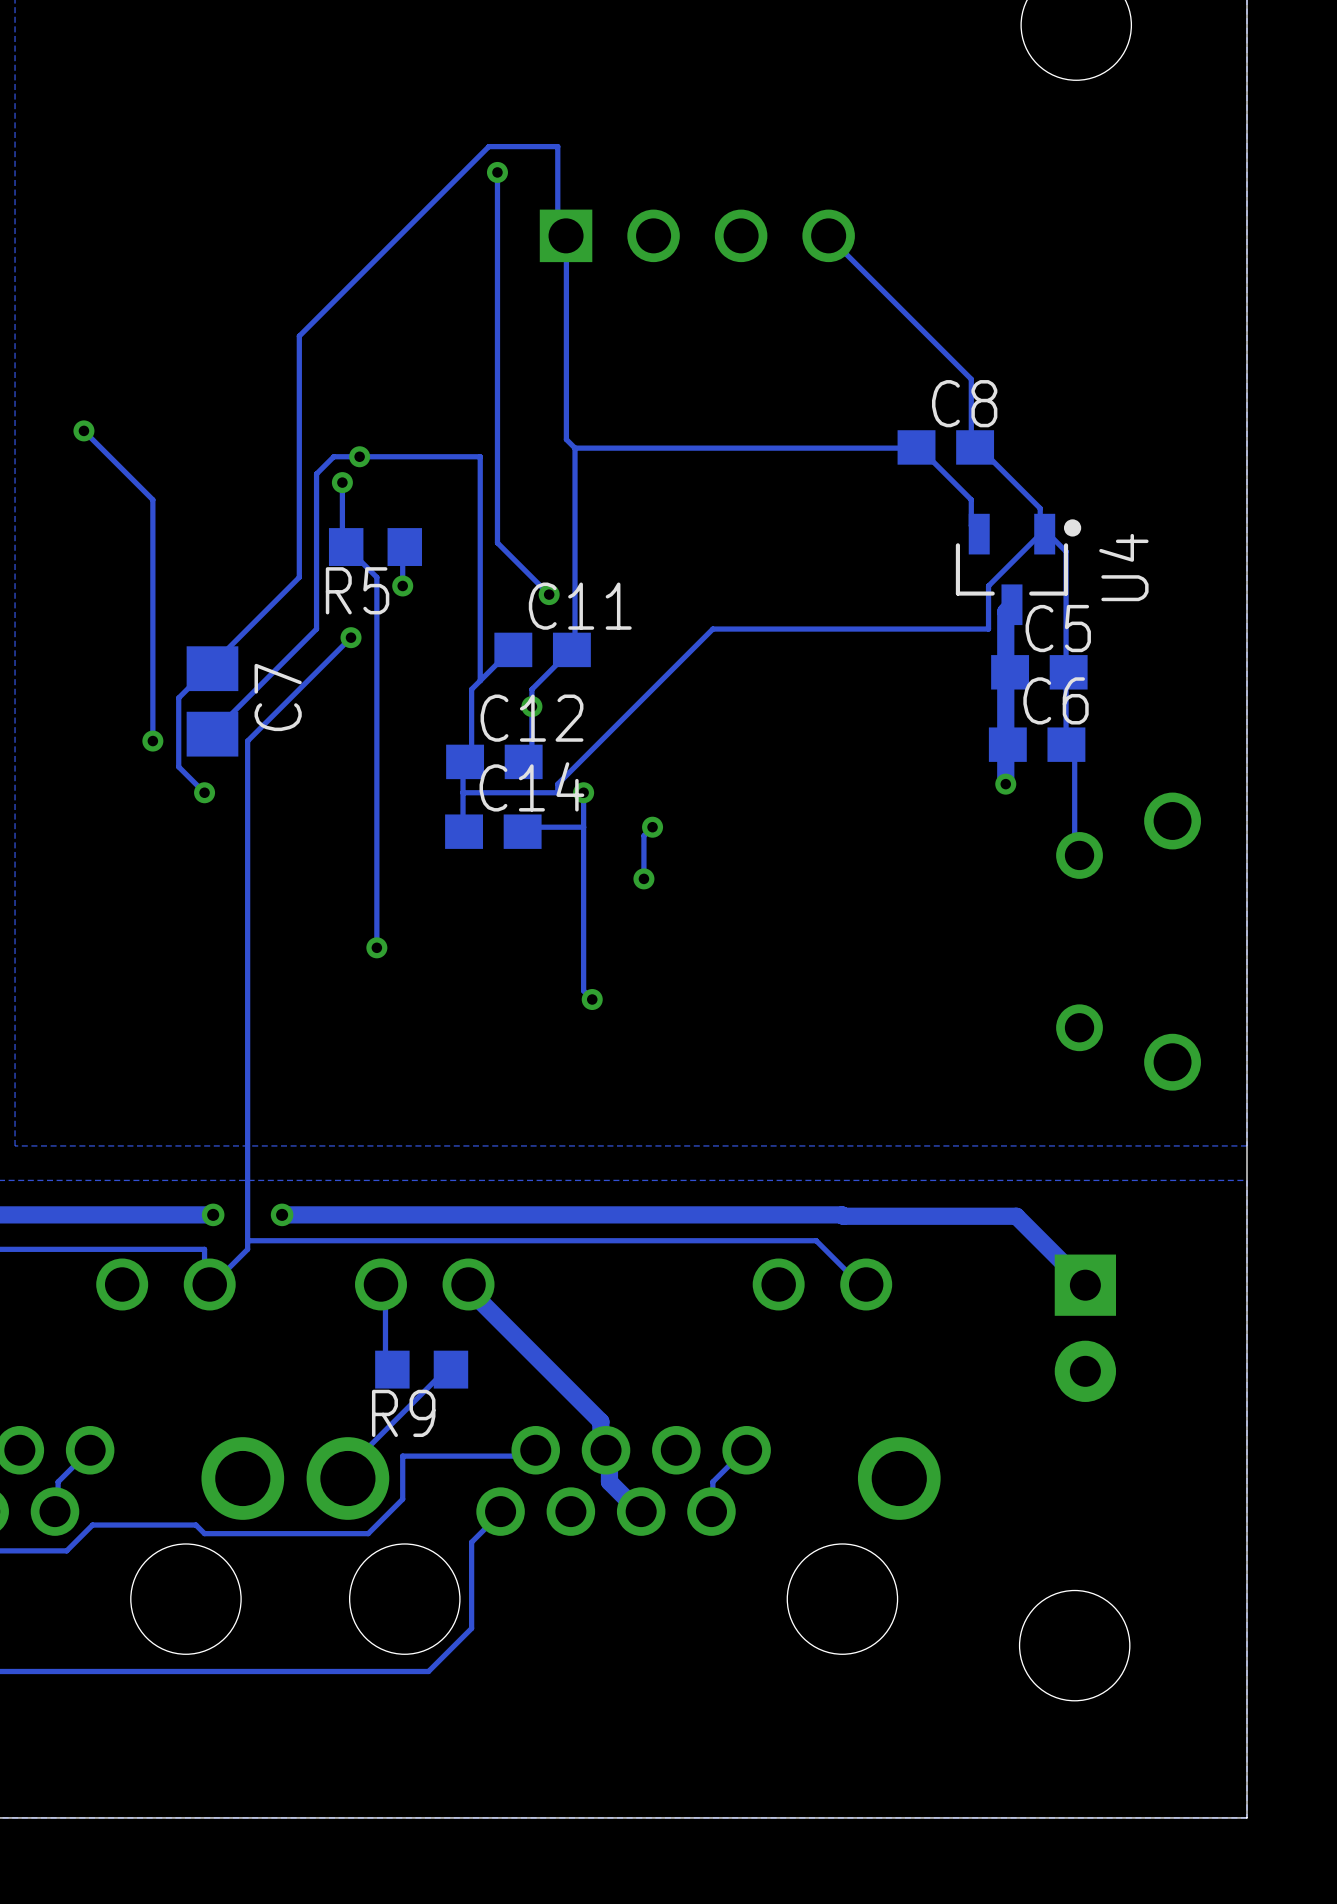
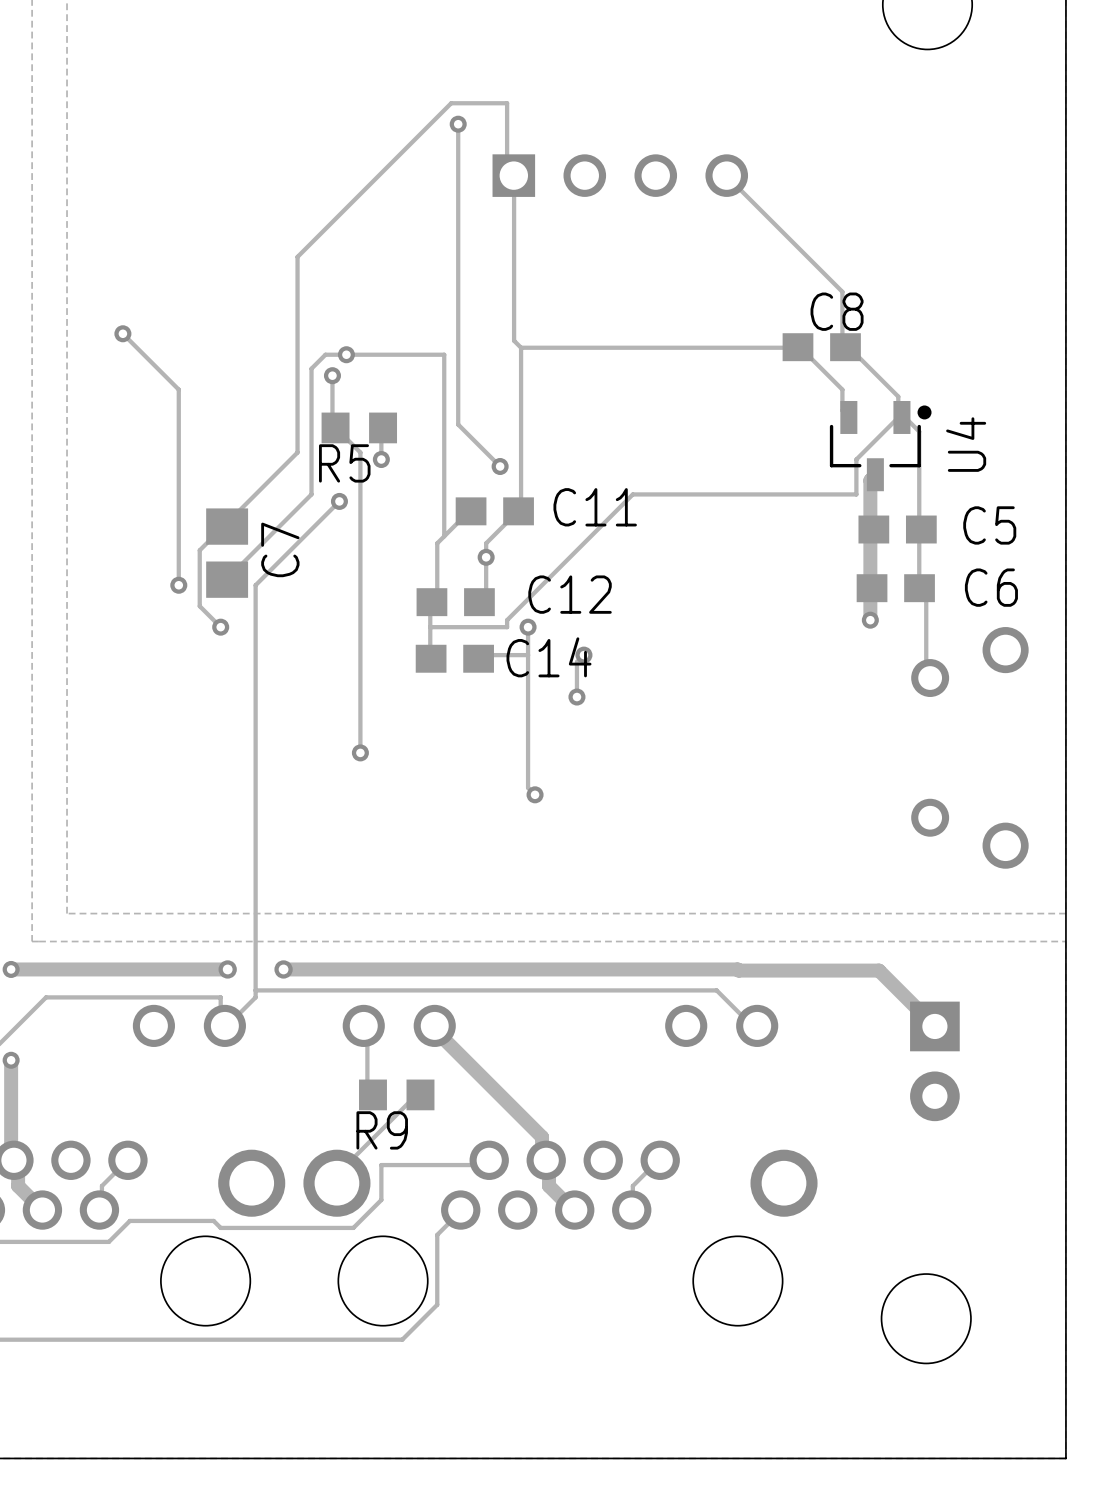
C11 name position: C11 (580, 606) -> C11 (595, 507)
C5 name position: C5 (1058, 628) -> C5 (989, 525)
C6 name position: C6 (1056, 700) -> C6 (991, 587)
C12 name position: C12 (532, 718) -> C12 (570, 594)
C14 name position: C14 (531, 786) -> C14 (549, 657)

